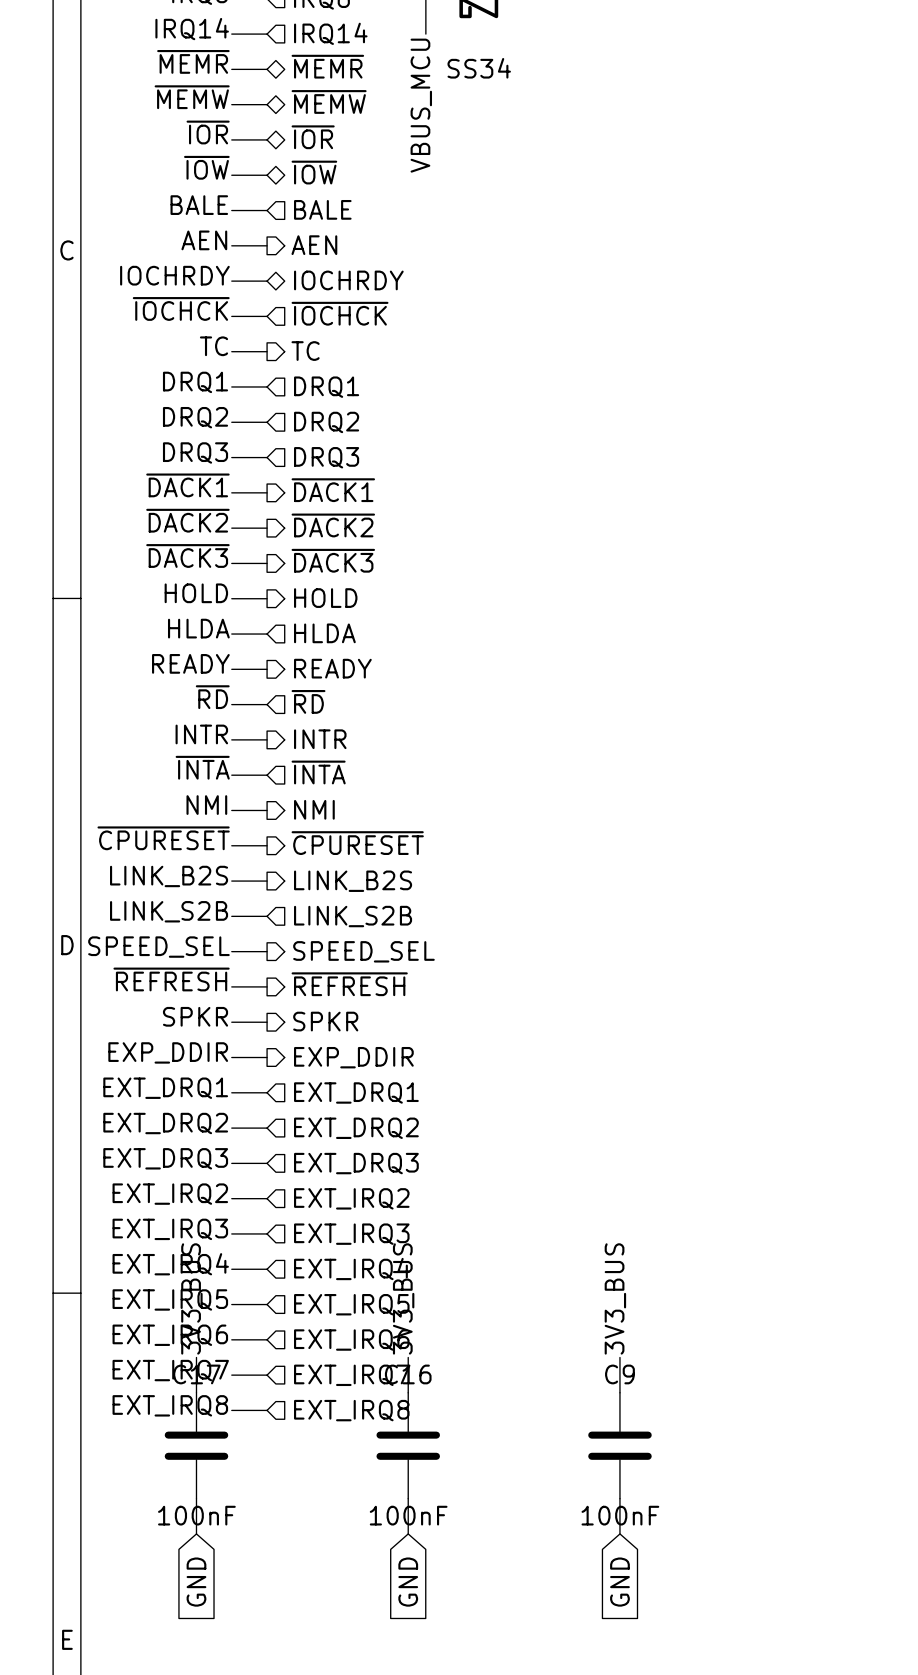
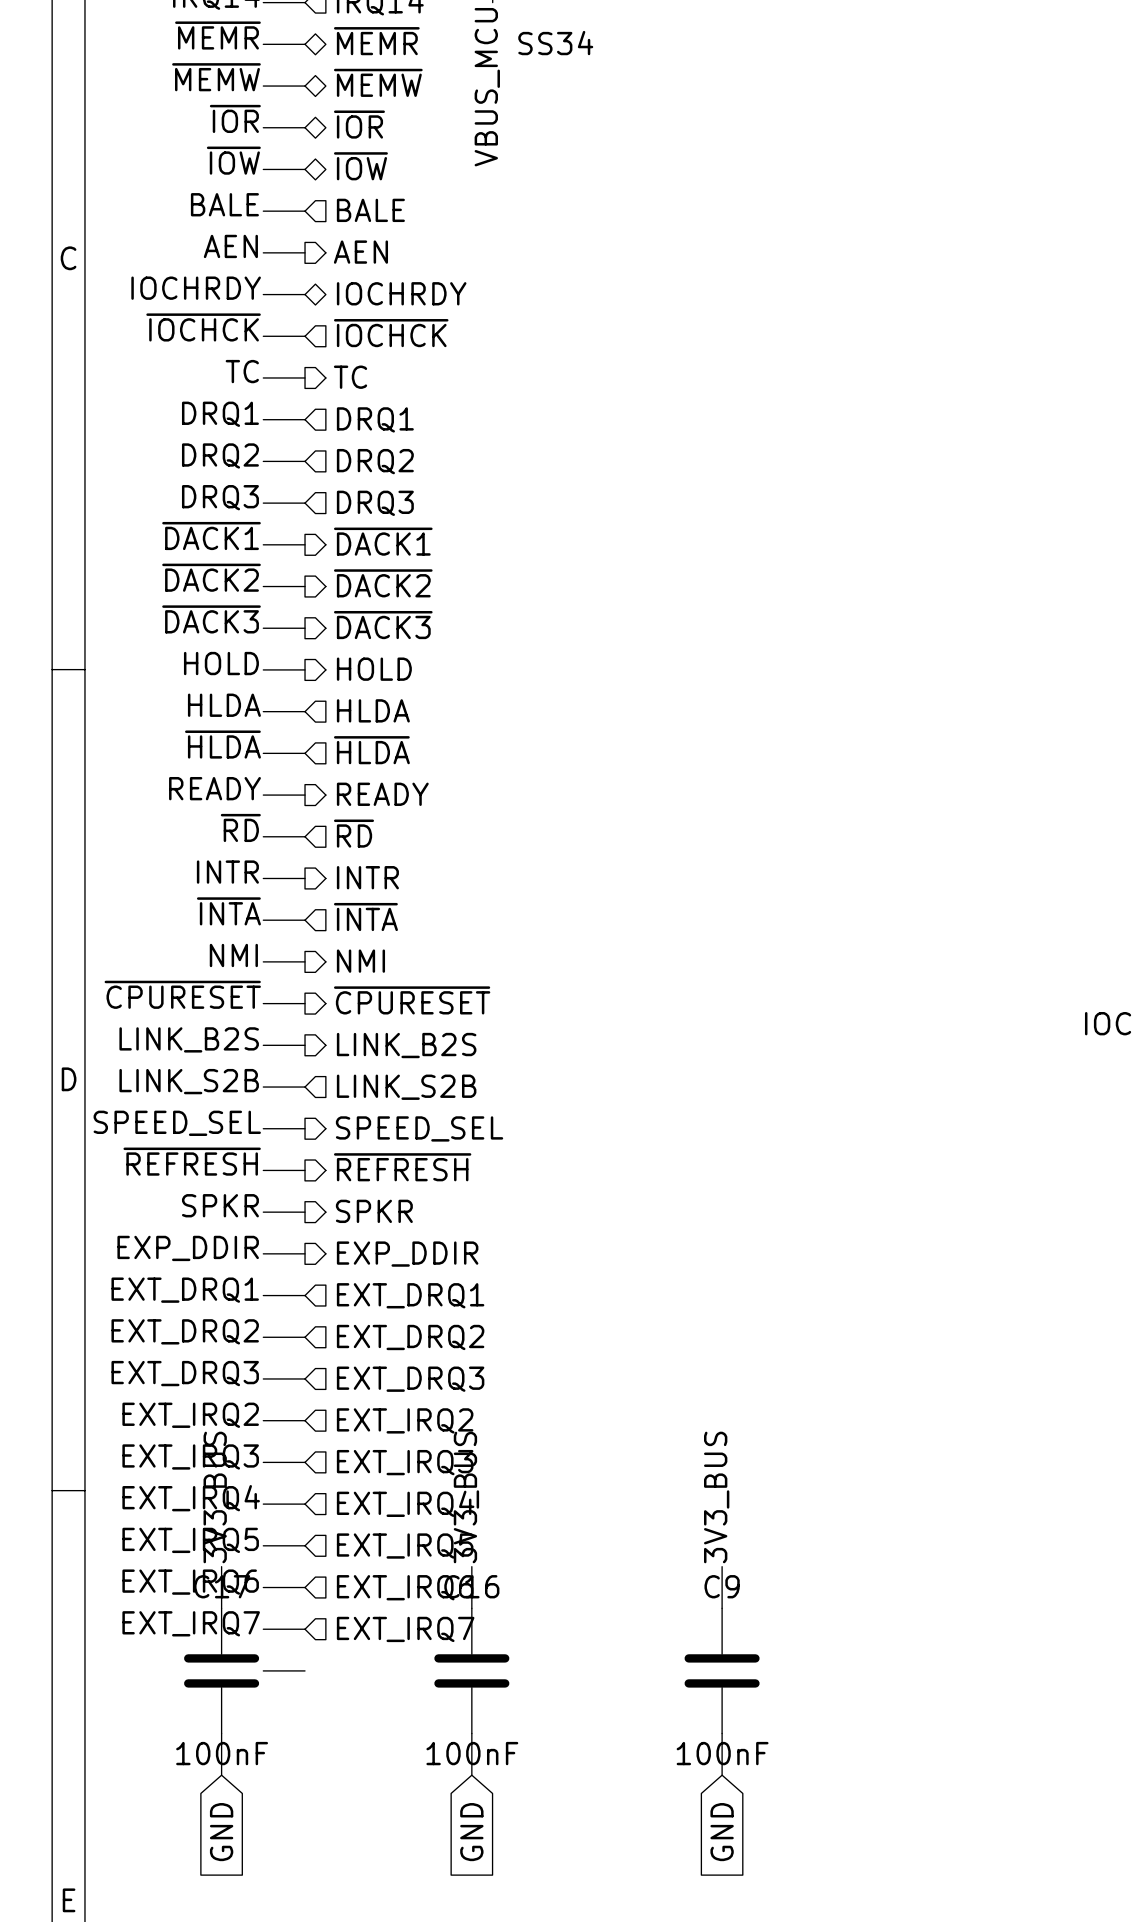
label: READY (190, 663) -> ~{HLDA} (222, 744)
hierarchical label shape: output (332, 668) -> input (371, 750)
hierarchical label: READY (332, 668) -> ~{HLDA} (371, 750)
label: ~{RD} (212, 697) -> READY (214, 788)
hierarchical label shape: input (308, 701) -> output (382, 794)
hierarchical label: ~{RD} (308, 701) -> READY (382, 794)
label: INTR (201, 734) -> ~{RD} (240, 827)
hierarchical label shape: output (320, 739) -> input (354, 833)
hierarchical label: INTR (320, 739) -> ~{RD} (354, 833)
label: ~{INTA} (202, 767) -> INTR (227, 872)
hierarchical label shape: input (318, 772) -> output (367, 877)
hierarchical label: ~{INTA} (318, 772) -> INTR (367, 877)
label: NMI (206, 805) -> ~{INTA} (228, 911)
hierarchical label shape: output (314, 809) -> input (365, 917)
hierarchical label: NMI (314, 809) -> ~{INTA} (365, 917)
label: ~{CPURESET} (163, 838) -> NMI (233, 955)
hierarchical label: ~{CPURESET} (357, 843) -> NMI (360, 961)
label: LINK_B2S (169, 876) -> ~{CPURESET} (182, 994)
hierarchical label: LINK_B2S (353, 881) -> ~{CPURESET} (412, 1000)
label: LINK_S2B (169, 911) -> LINK_B2S (189, 1039)
hierarchical label shape: input (353, 916) -> output (406, 1045)
hierarchical label: LINK_S2B (353, 916) -> LINK_B2S (406, 1045)
label: SPEED_SEL (158, 947) -> LINK_S2B (189, 1081)
hierarchical label shape: output (363, 951) -> input (406, 1087)
hierarchical label: SPEED_SEL (363, 951) -> LINK_S2B (406, 1087)
label: ~{REFRESH} (171, 979) -> SPEED_SEL (177, 1123)
hierarchical label: ~{REFRESH} (349, 984) -> SPEED_SEL (419, 1128)
label: SPKR (195, 1016) -> ~{REFRESH} (192, 1161)
hierarchical label: SPKR (325, 1021) -> ~{REFRESH} (402, 1167)
label: EXP_DDIR (168, 1052) -> SPKR (220, 1205)
hierarchical label: EXP_DDIR (353, 1057) -> SPKR (374, 1211)
label: EXT_DRQ1 (165, 1088) -> EXP_DDIR (188, 1248)
hierarchical label shape: input (356, 1092) -> output (407, 1254)
hierarchical label: EXT_DRQ1 (356, 1092) -> EXP_DDIR (407, 1254)
label: EXT_DRQ2 (165, 1123) -> EXT_DRQ1 (185, 1290)
hierarchical label: EXT_DRQ2 (356, 1128) -> EXT_DRQ1 (410, 1295)
label: EXT_DRQ3 (165, 1158) -> EXT_DRQ2 (185, 1331)
hierarchical label: EXT_DRQ3 (356, 1163) -> EXT_DRQ2 (410, 1337)
label: EXT_IRQ2 (170, 1194) -> EXT_DRQ3 (185, 1373)
hierarchical label: EXT_IRQ2 (351, 1198) -> EXT_DRQ3 (410, 1379)
label: EXT_IRQ3 (170, 1229) -> EXT_IRQ2 (190, 1415)
hierarchical label: EXT_IRQ3 (351, 1234) -> EXT_IRQ2 (405, 1420)
label: EXT_IRQ4 (170, 1264) -> EXT_IRQ3 (190, 1456)
hierarchical label: EXT_IRQ4 (352, 1269) -> EXT_IRQ3 (405, 1462)
label: EXT_IRQ5 (170, 1299) -> EXT_IRQ4 (191, 1498)
hierarchical label: EXT_IRQ5 (351, 1304) -> EXT_IRQ4 (405, 1503)
label: EXT_IRQ6 (170, 1335) -> EXT_IRQ5 (190, 1540)
hierarchical label: EXT_IRQ6 (351, 1340) -> EXT_IRQ5 (405, 1546)
label: EXT_IRQ7 (170, 1370) -> EXT_IRQ6 (190, 1582)
hierarchical label: EXT_IRQ7 (352, 1375) -> EXT_IRQ6 (405, 1587)
label: EXT_IRQ8 (170, 1405) -> EXT_IRQ7 (191, 1623)
hierarchical label: EXT_IRQ8 (351, 1410) -> EXT_IRQ7 (405, 1629)
wire: none -> (263, 1670) (305, 1670)

